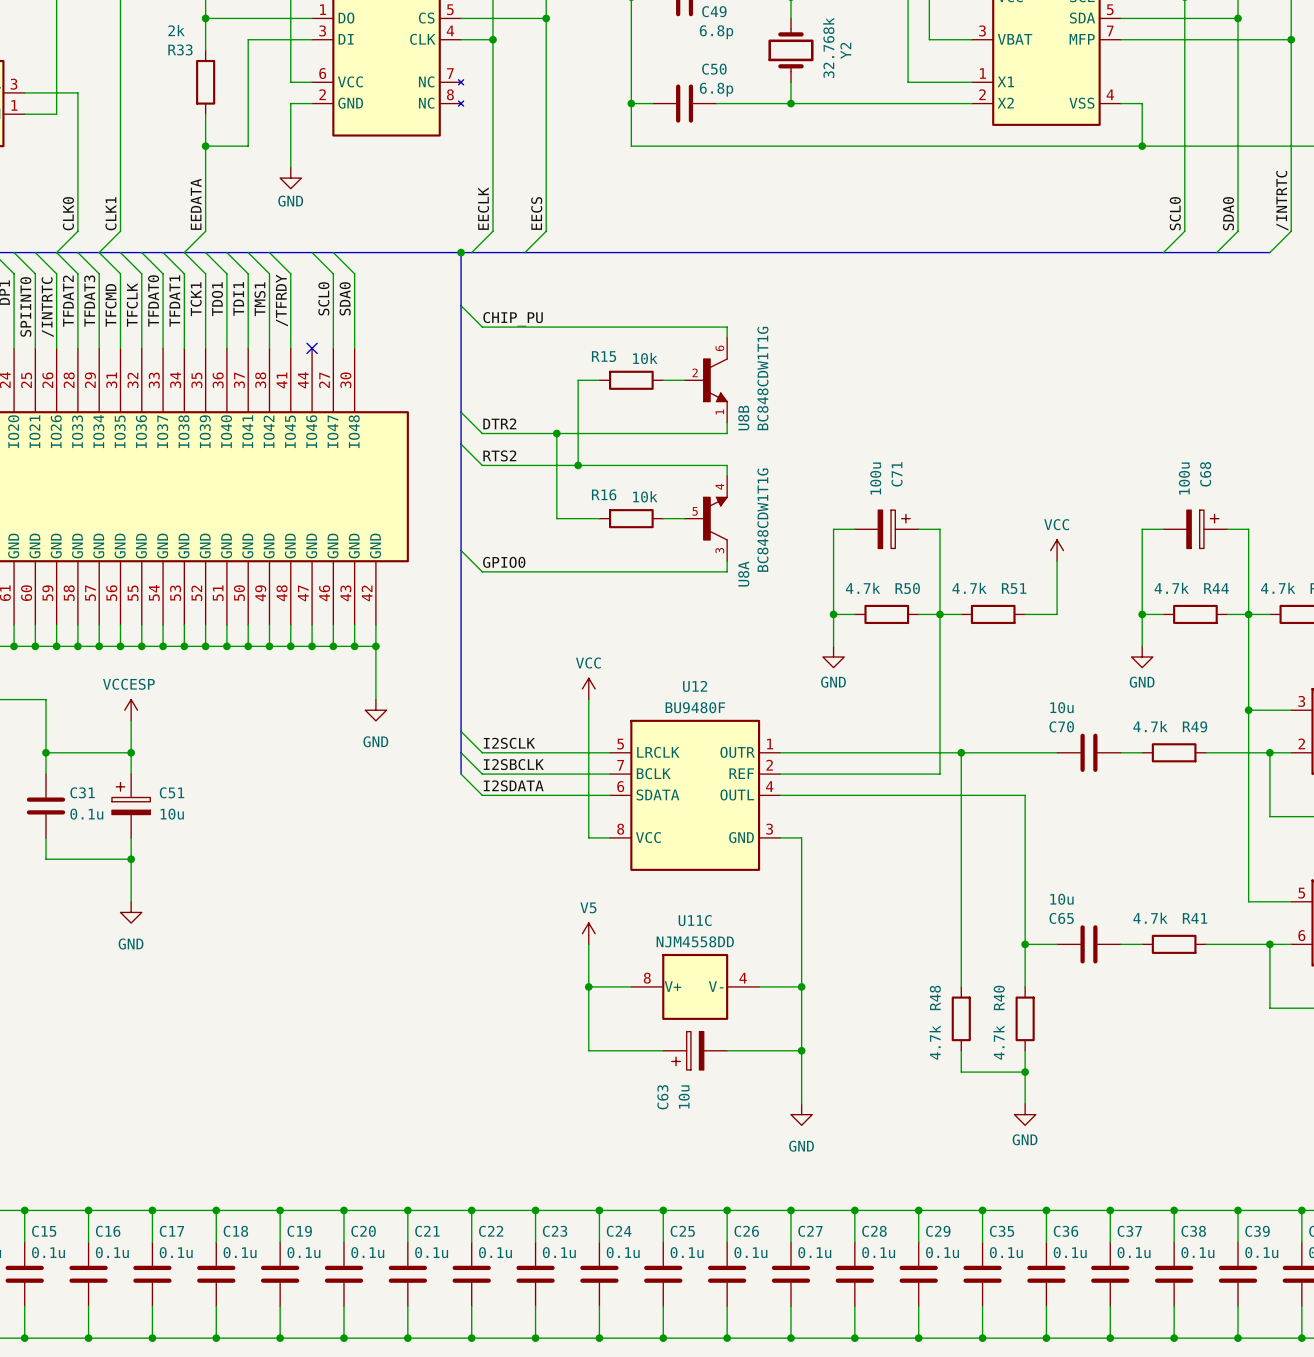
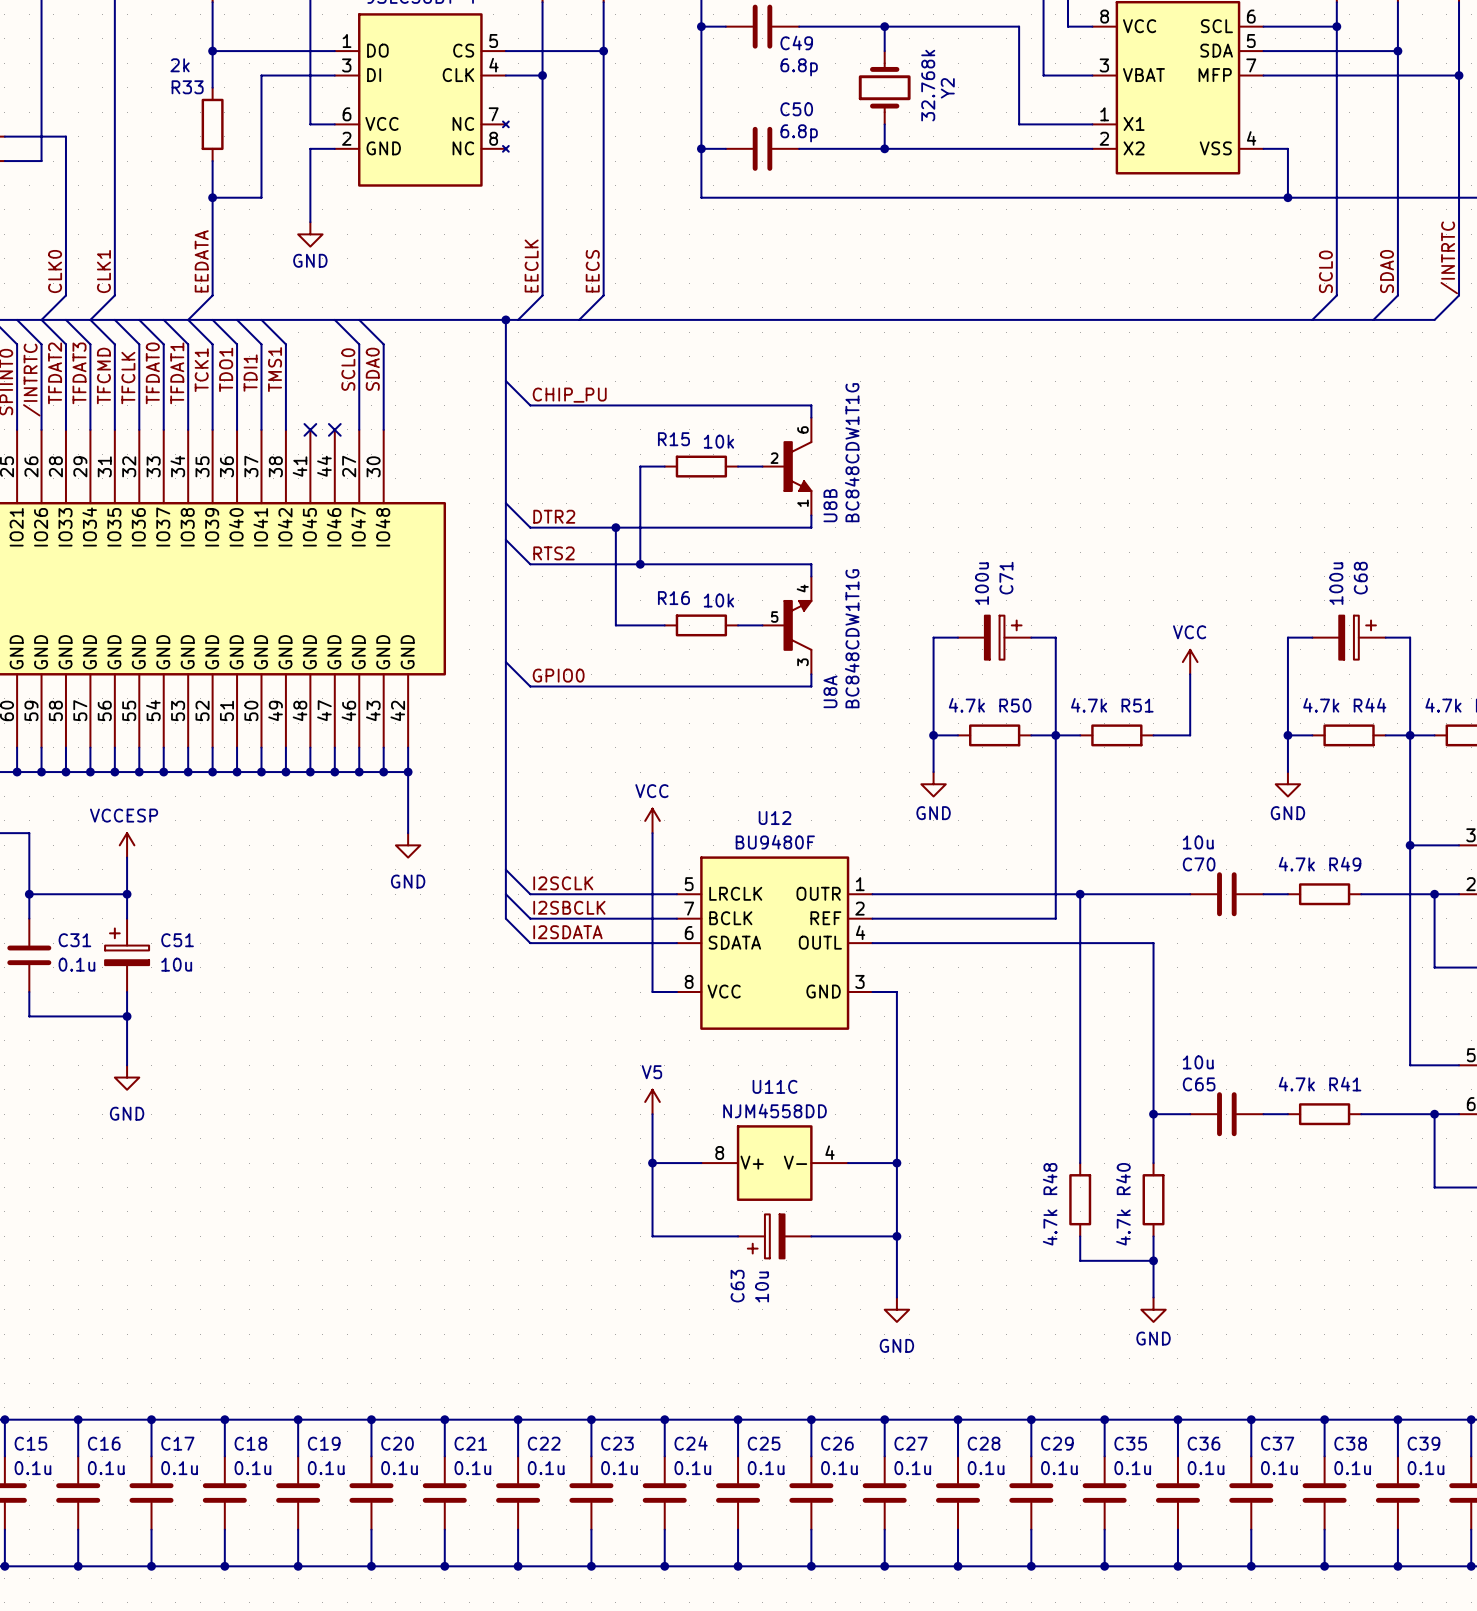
wire: (269, 252) (290, 273) (290, 348) -> none
label: /TFRDY (281, 300) -> none
no-connect mark: none -> (310, 429)

